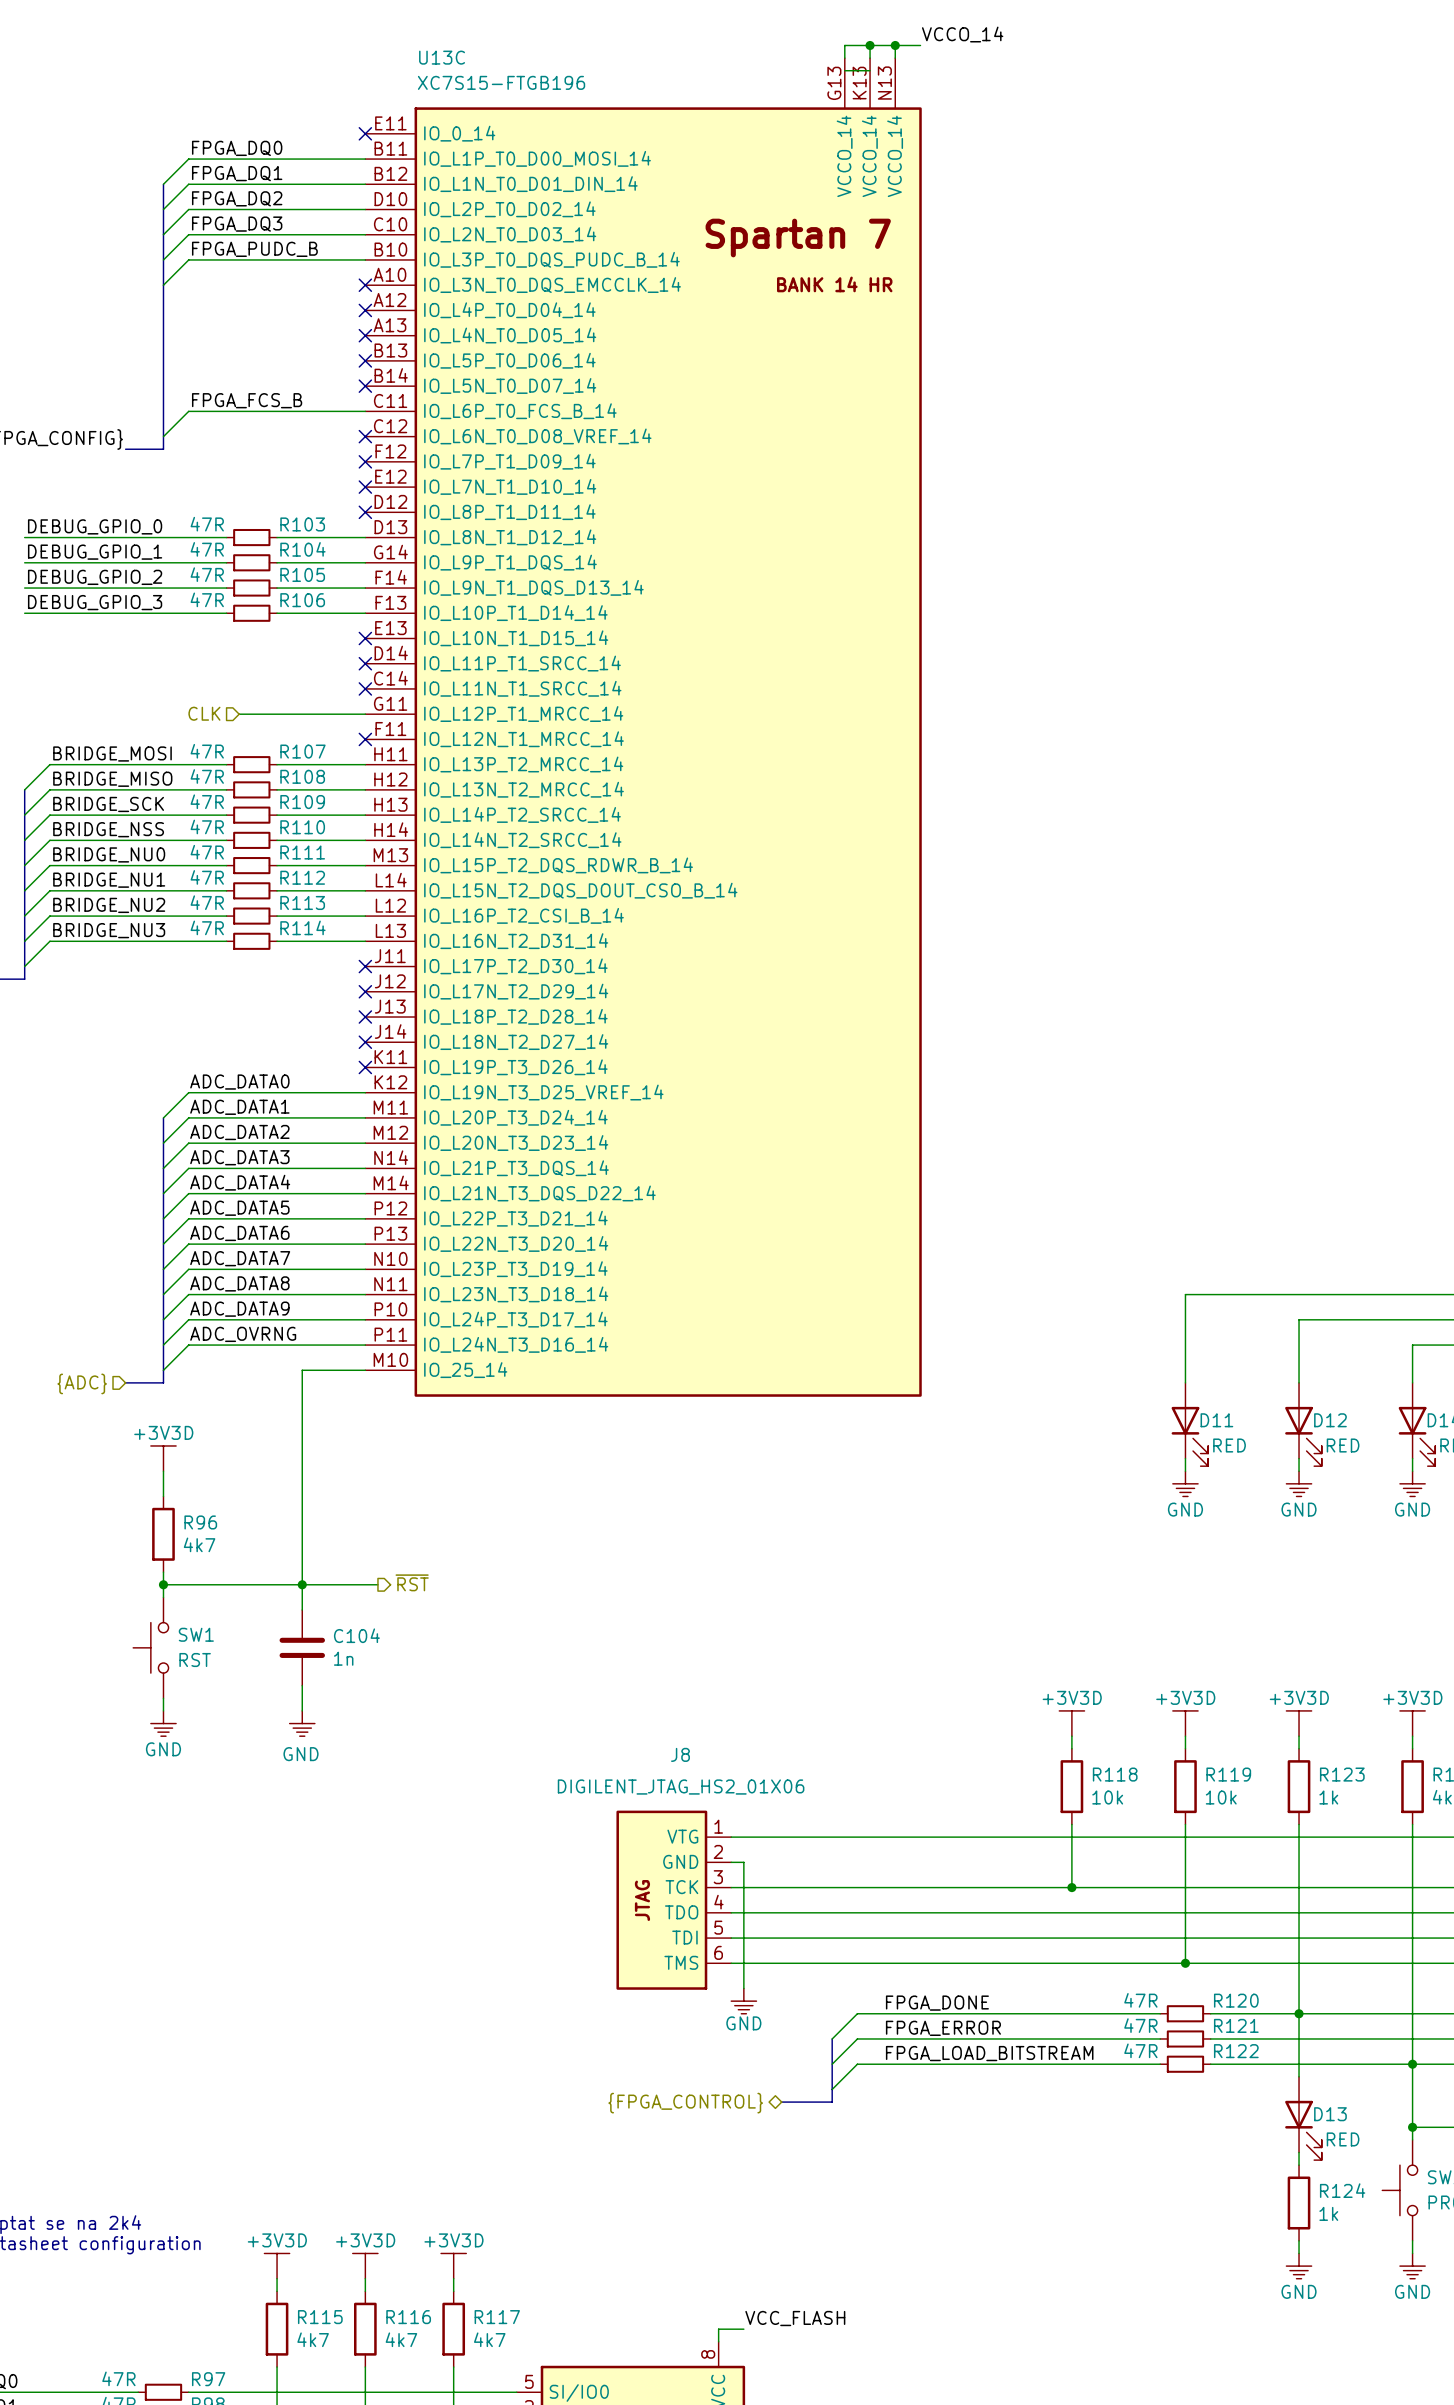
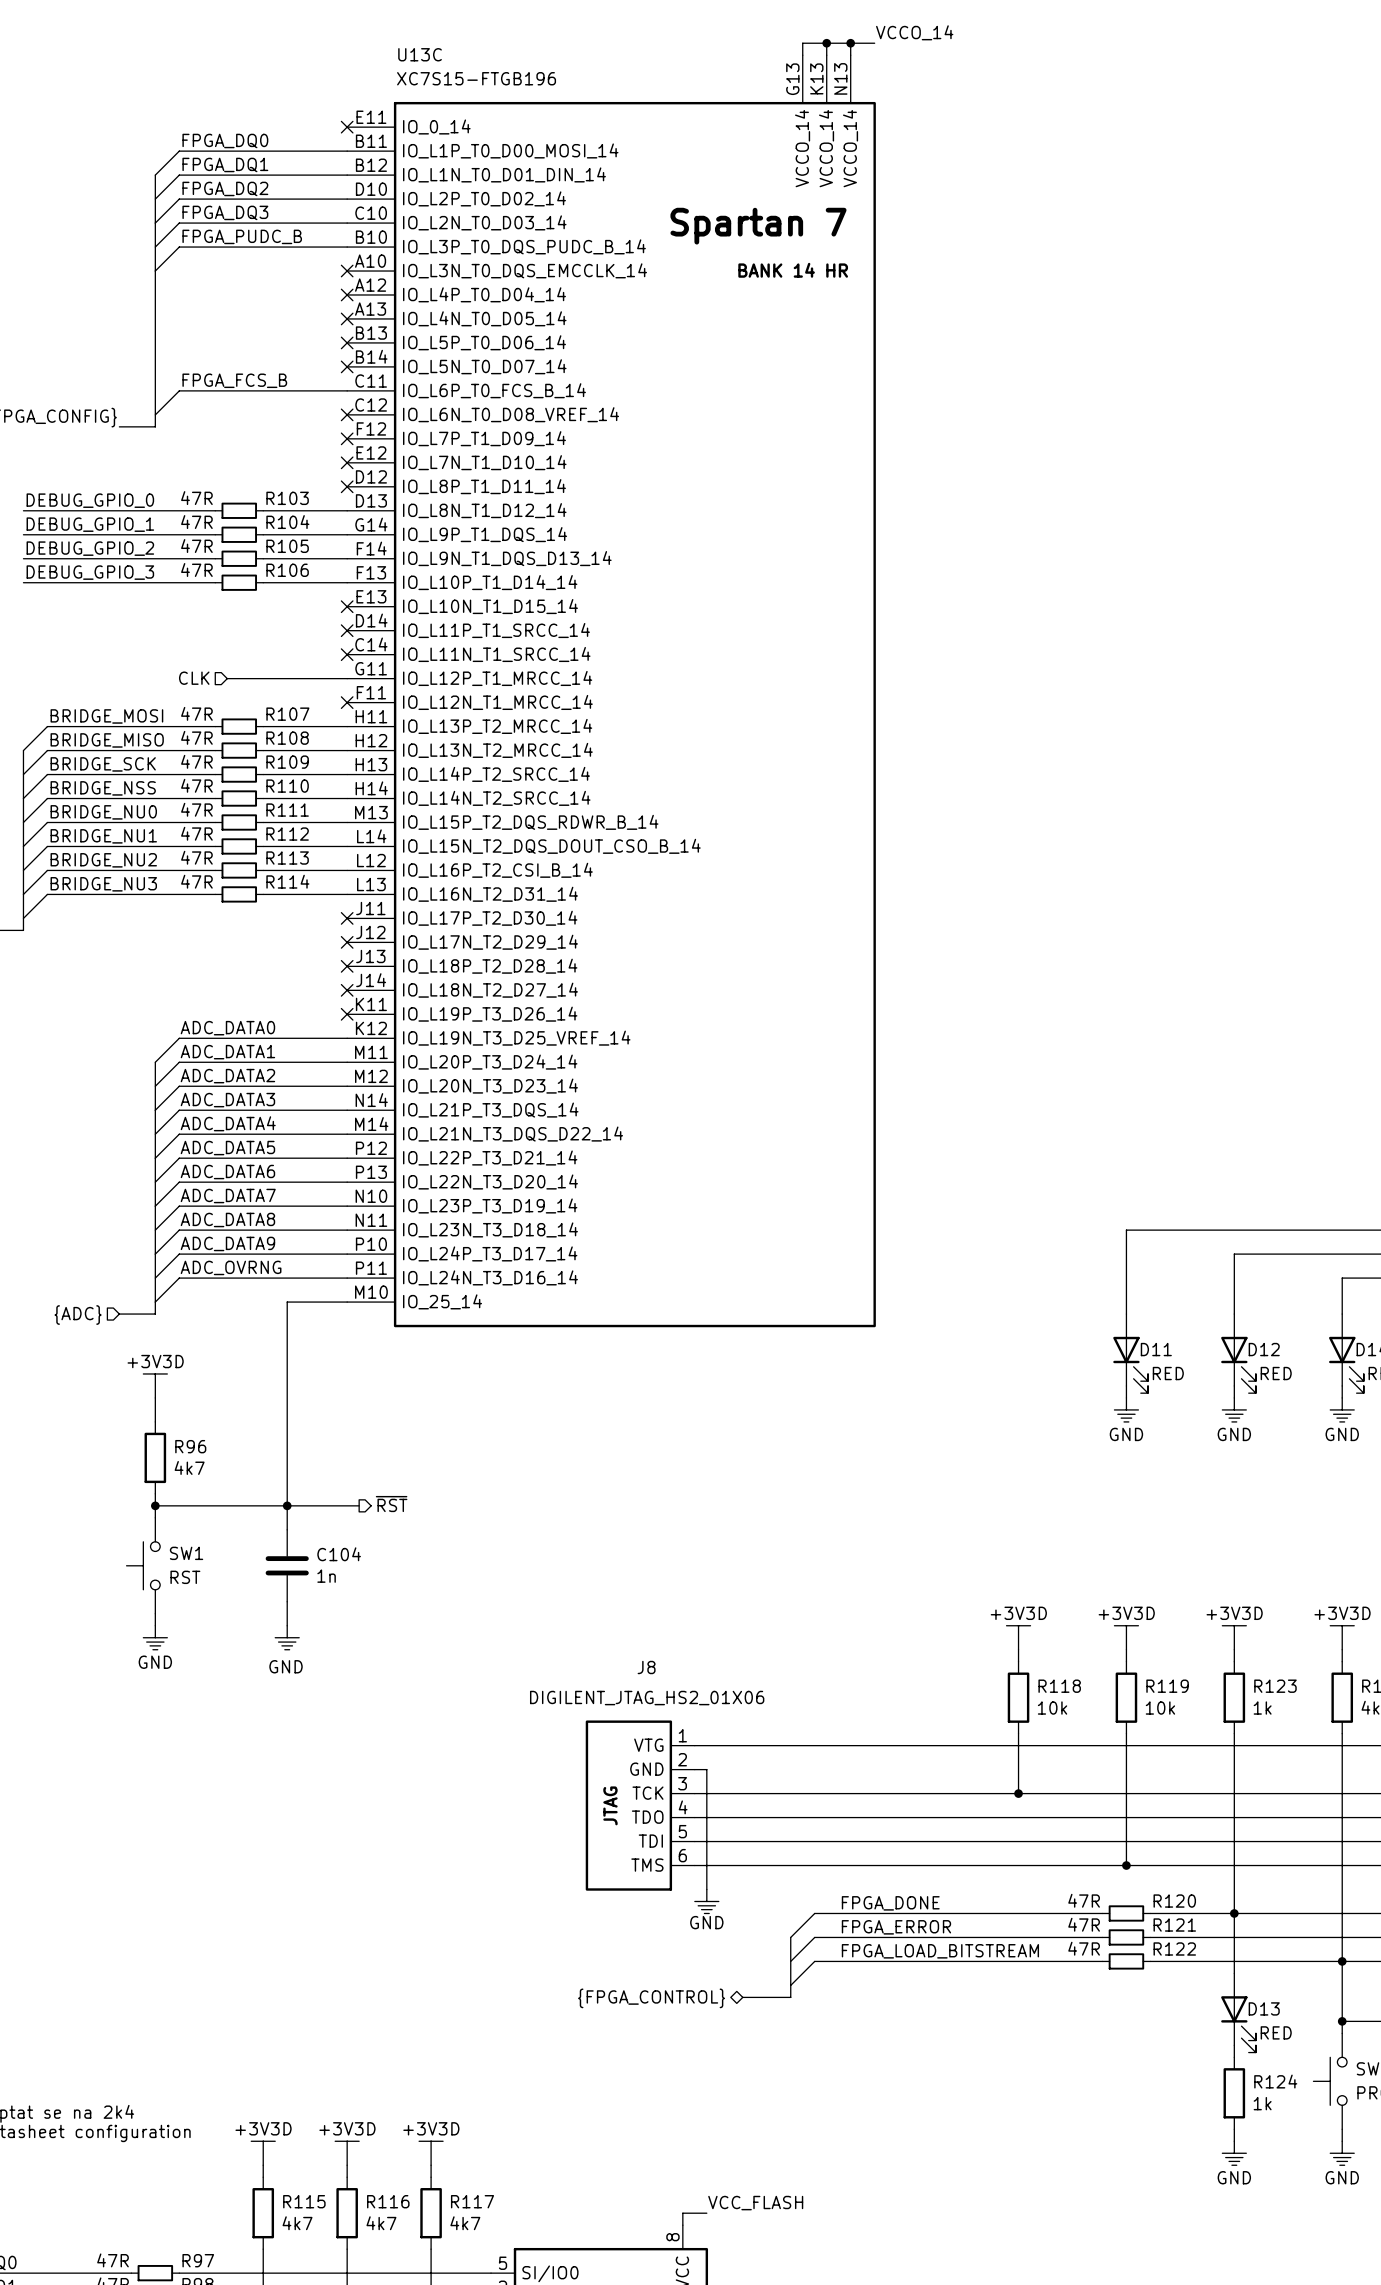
wire: (844, 70) (870, 70) -> none

